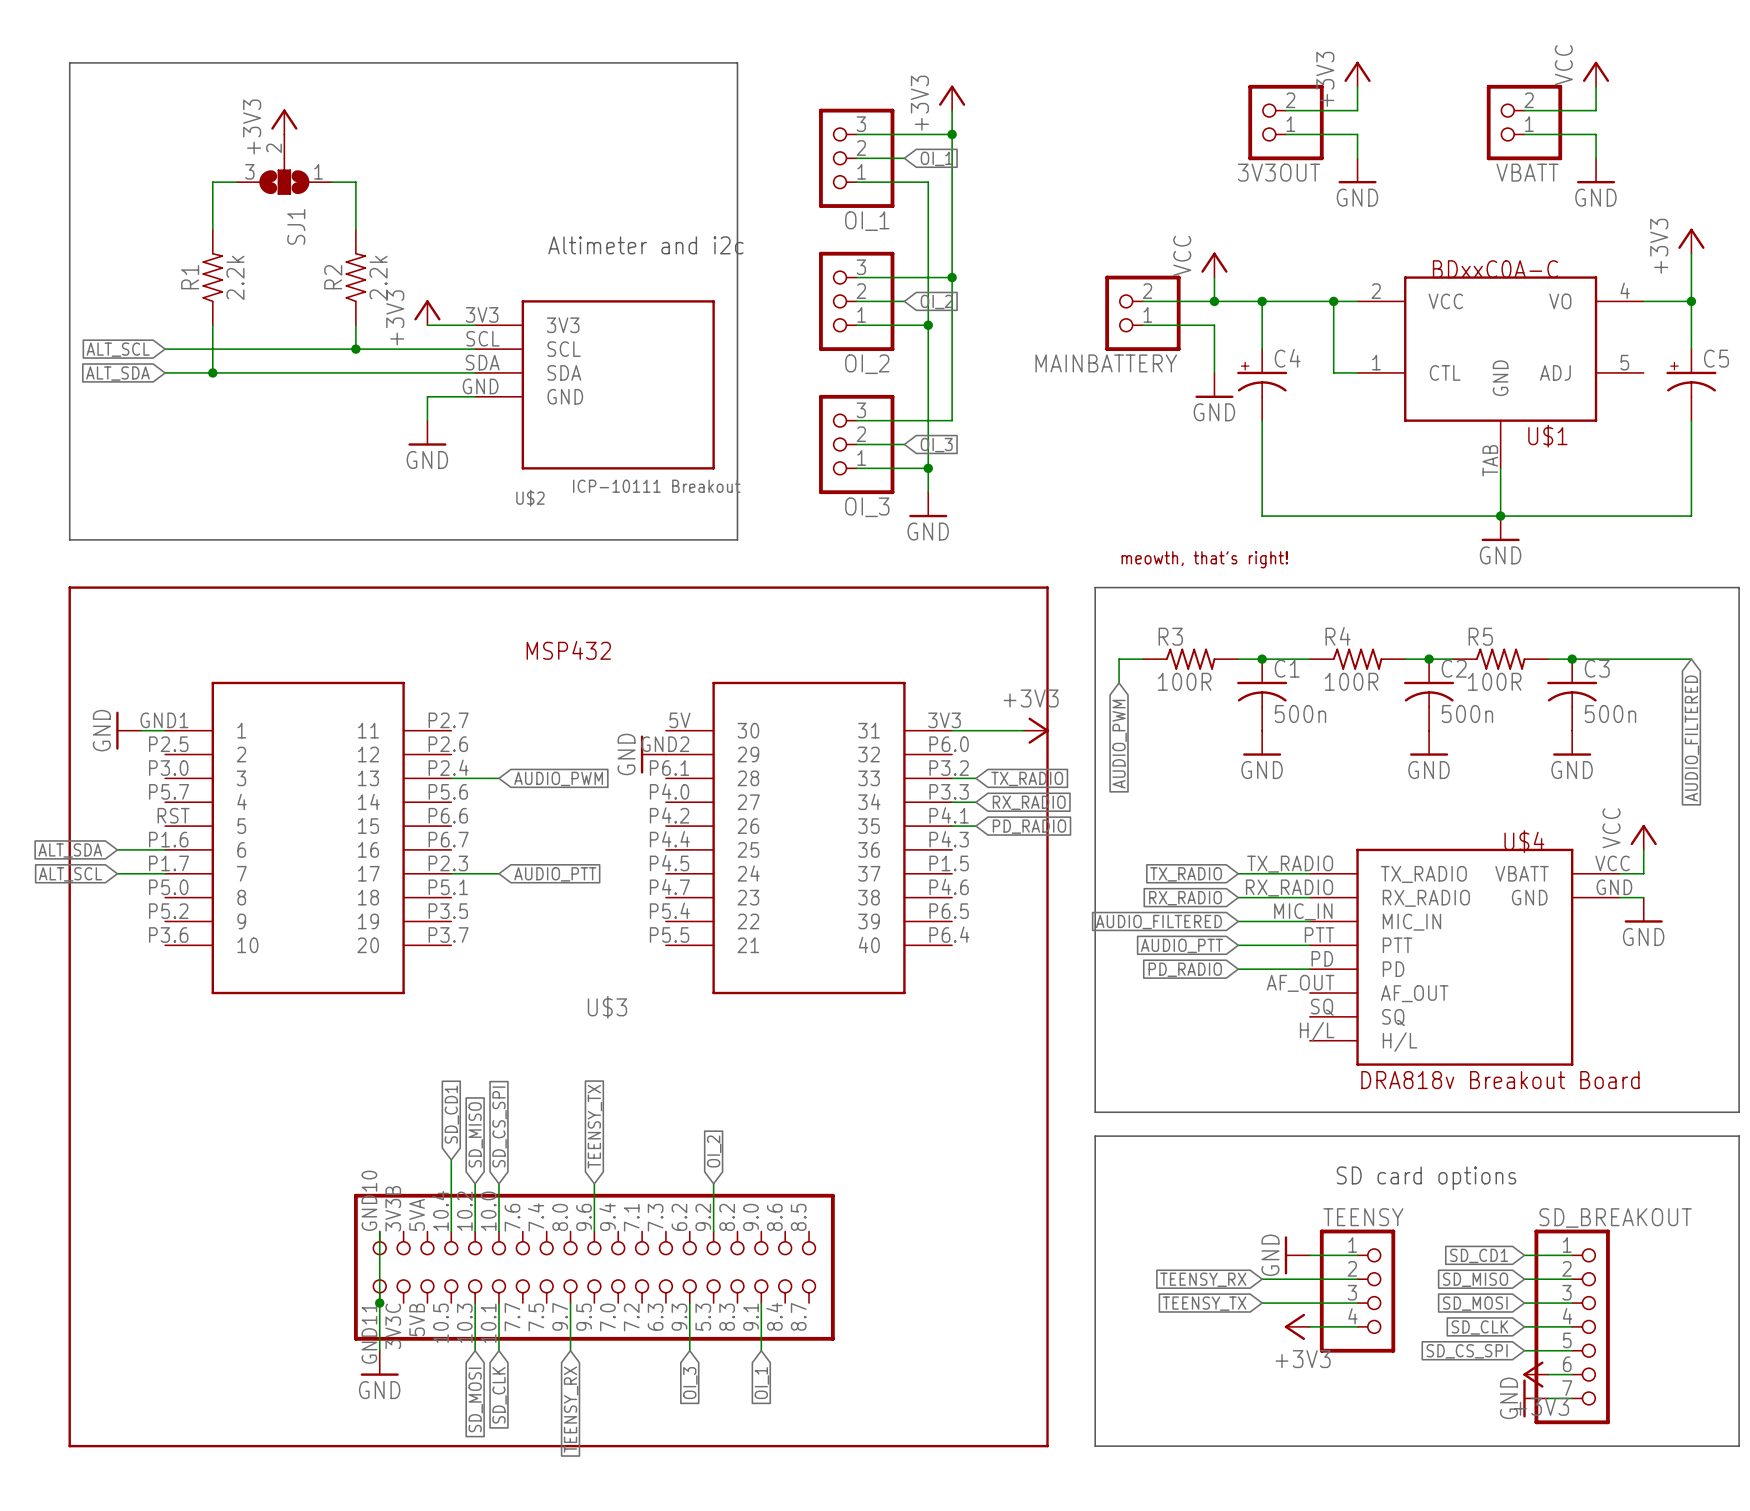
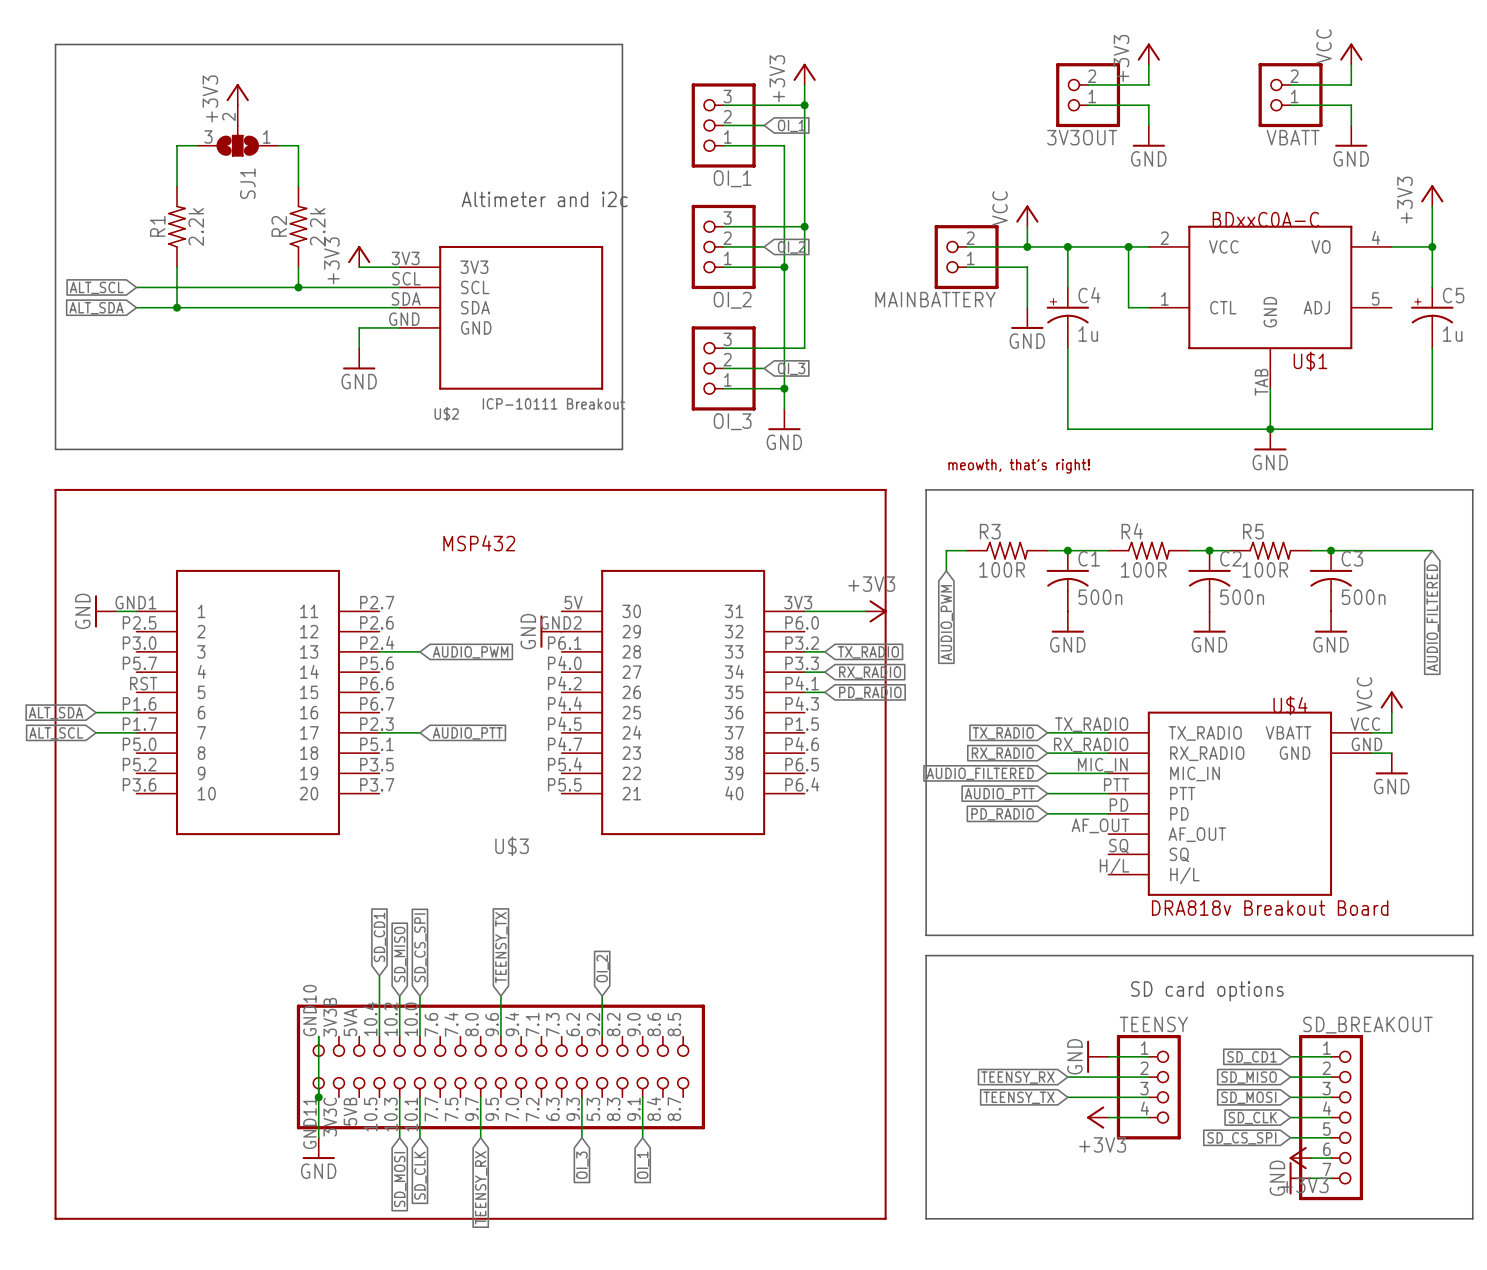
C4 value: none -> 1u (1088, 334)
C5 value: none -> 1u (1452, 334)

